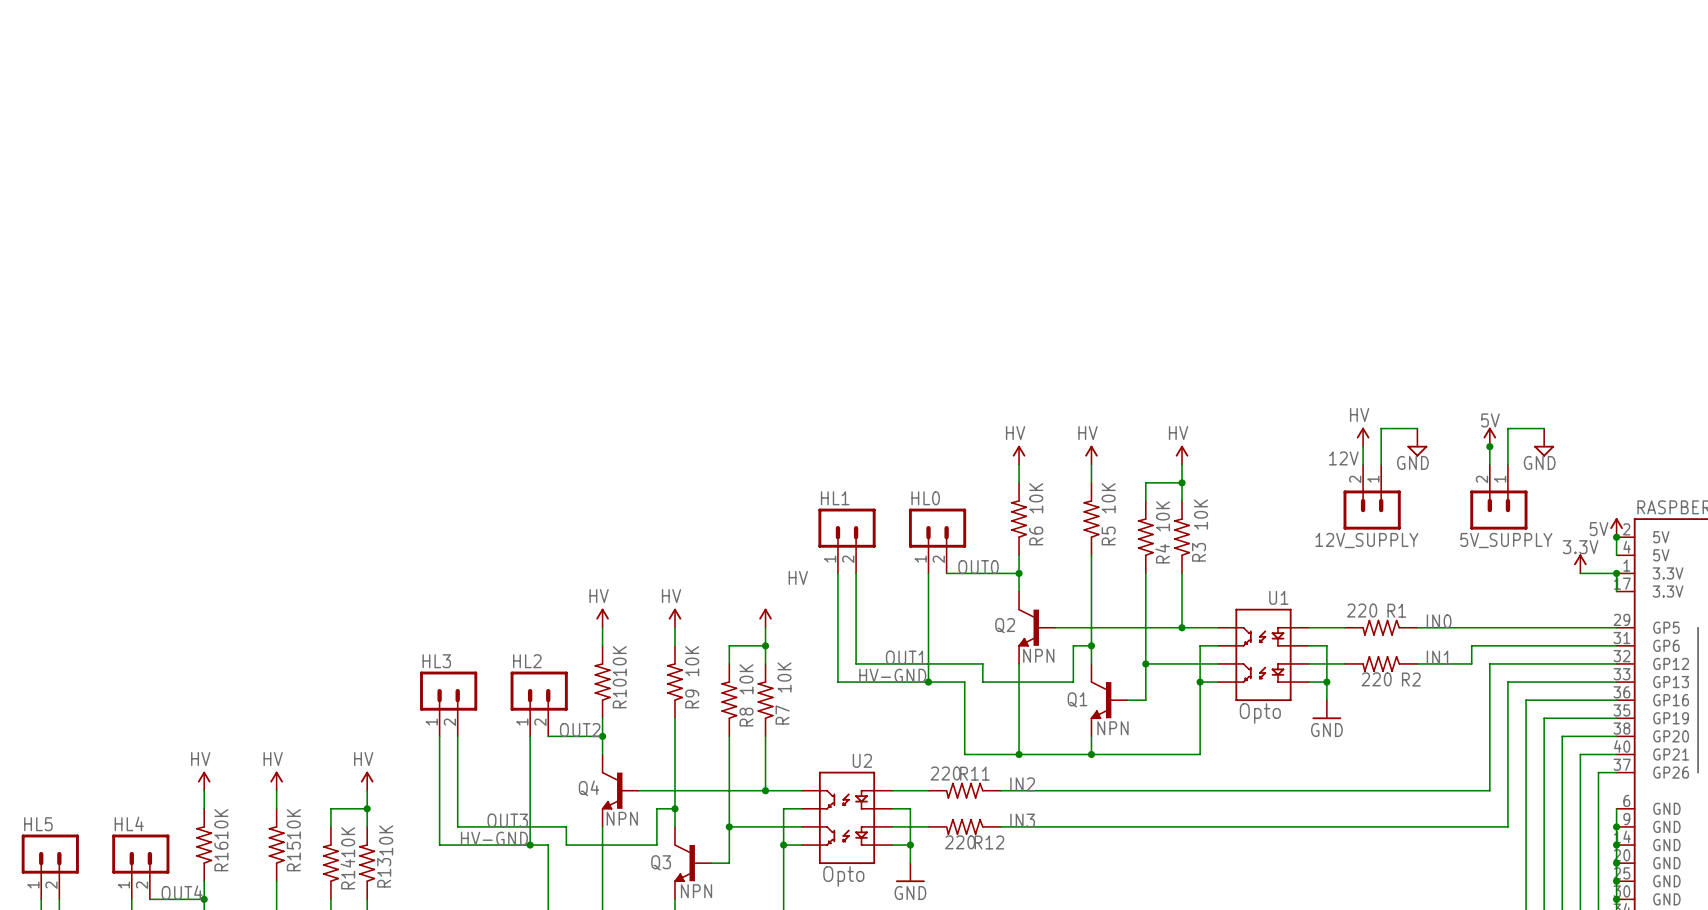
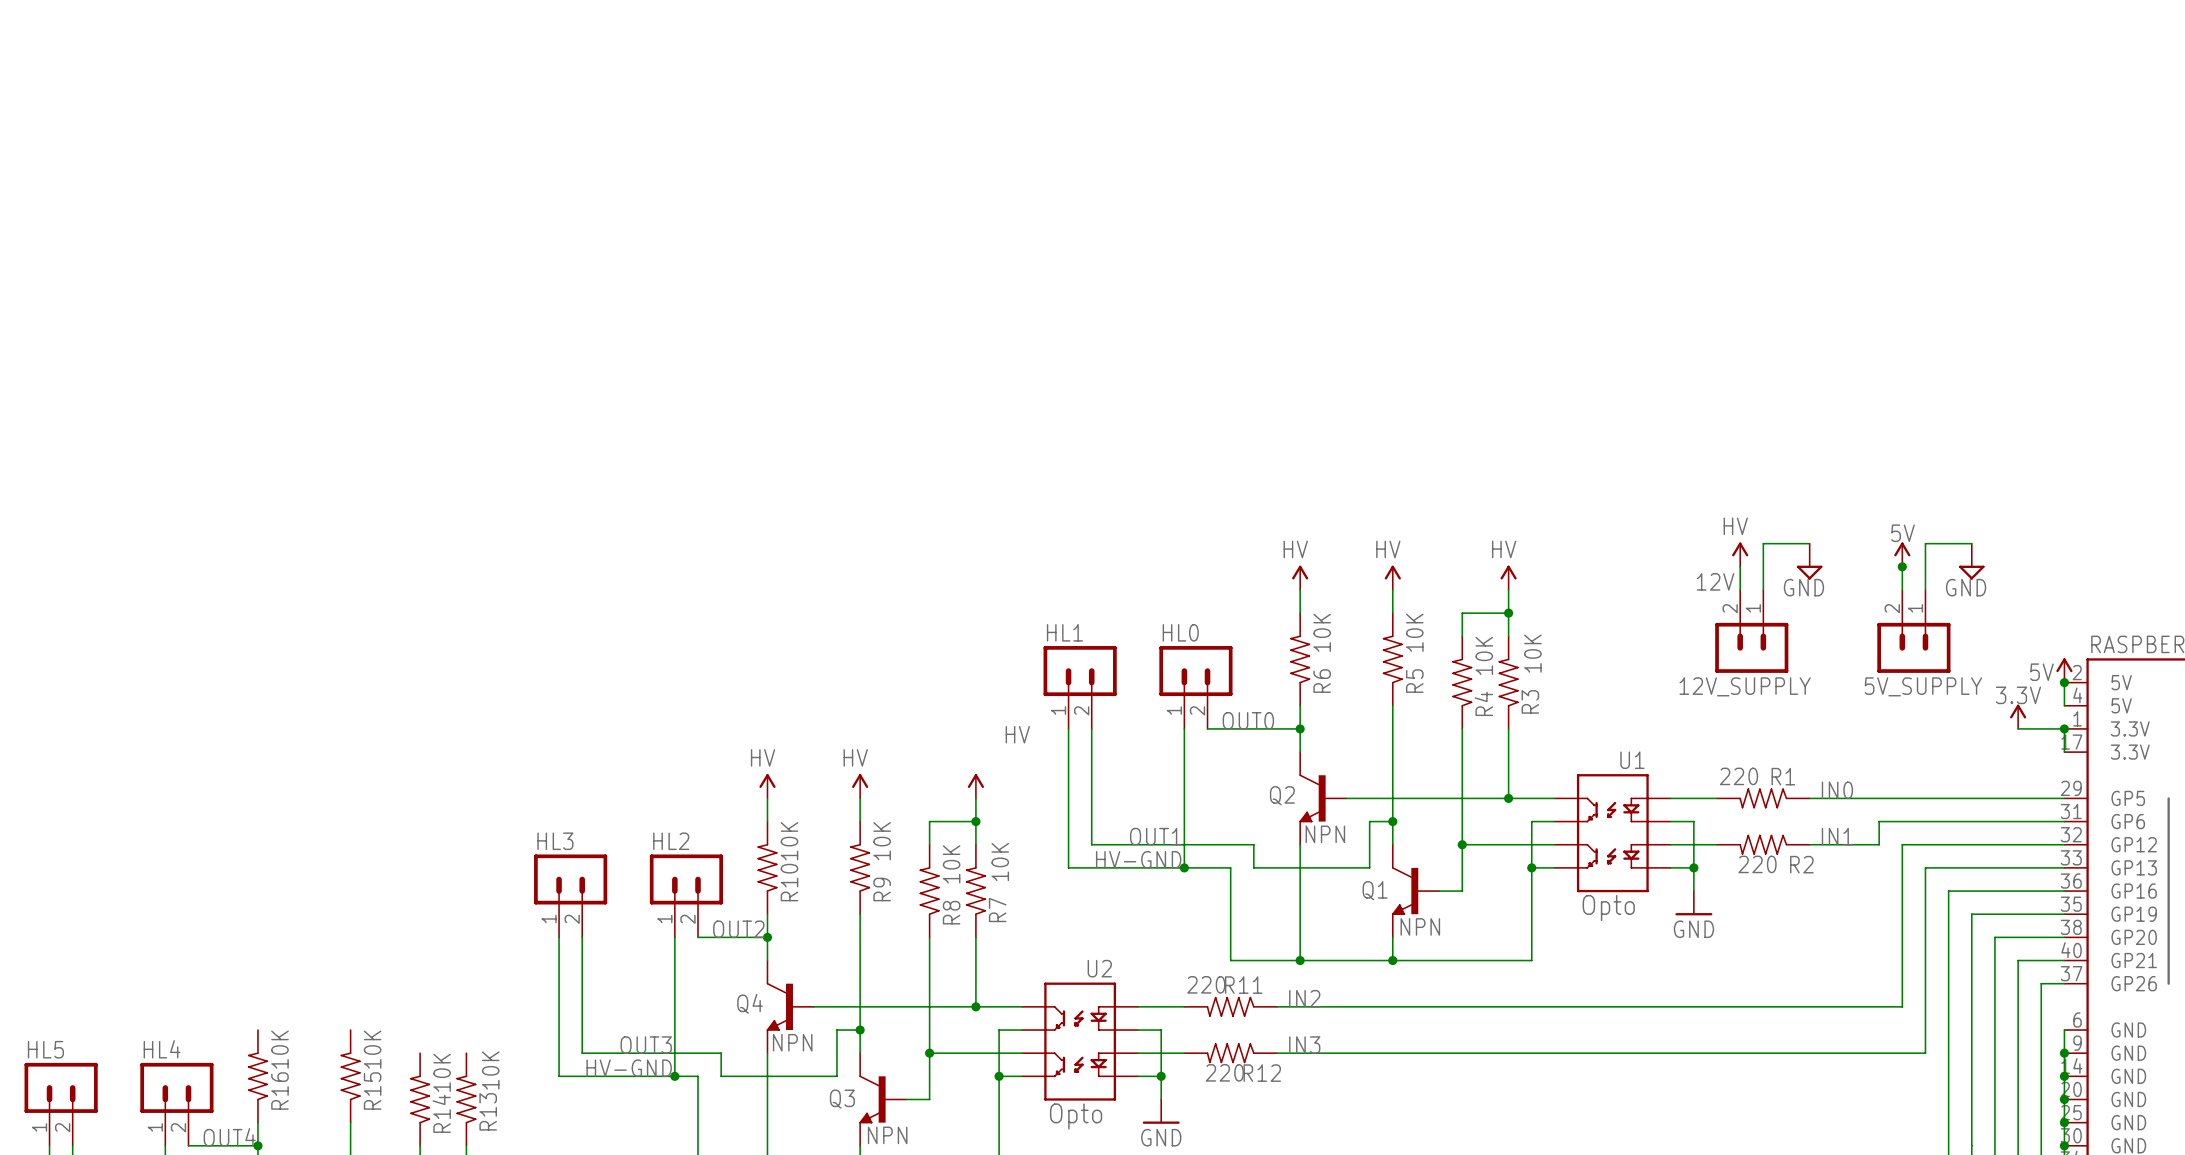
power symbol: HV (204, 781) -> none
power symbol: HV (276, 781) -> none
power symbol: HV (367, 781) -> none
wire: (204, 790) (204, 808) -> none
wire: (276, 790) (276, 808) -> none
wire: (367, 790) (367, 826) -> none
wire: (367, 808) (330, 808) (330, 826) -> none
junction: (367, 808) -> none

